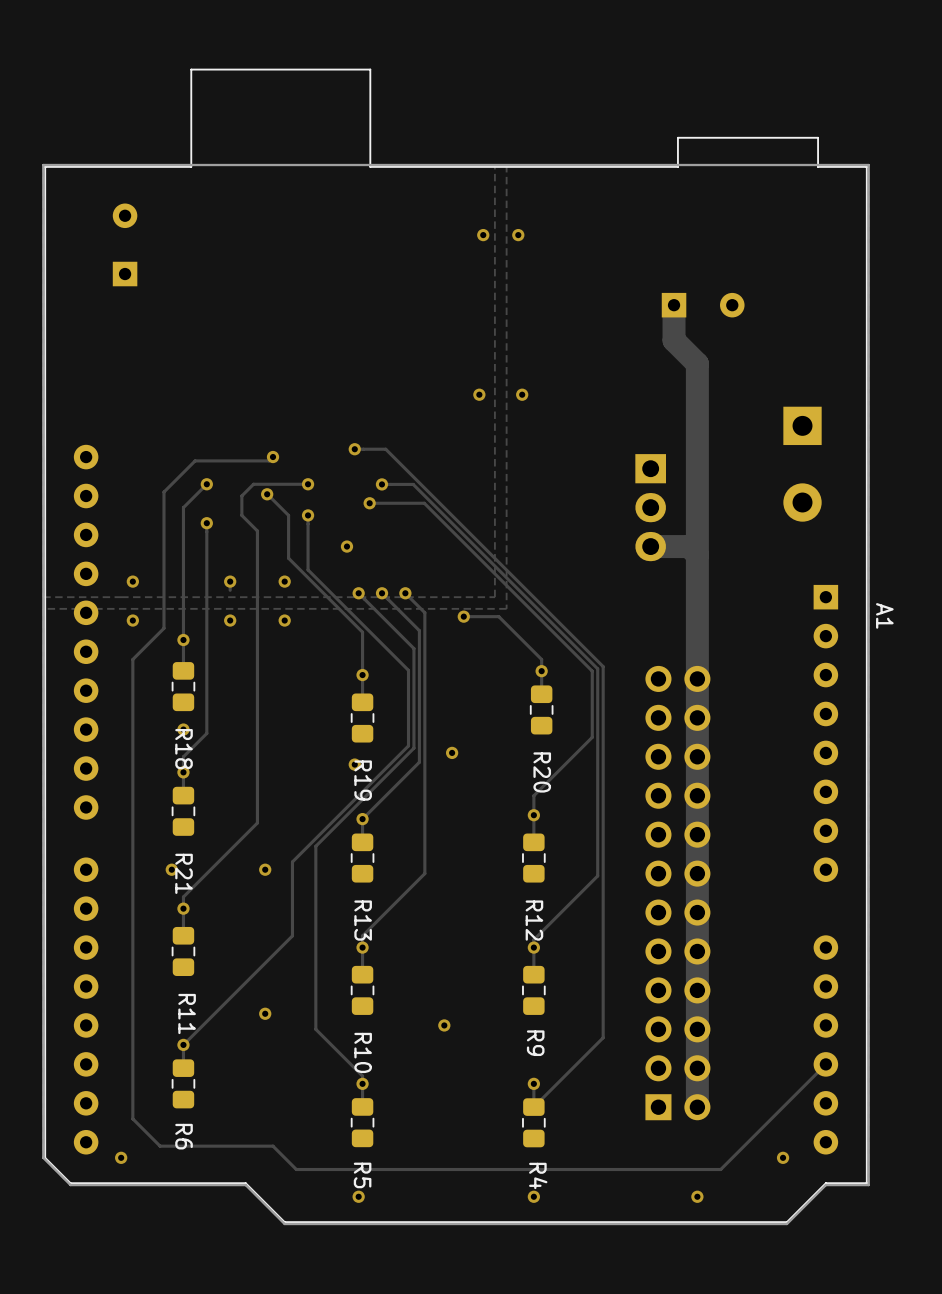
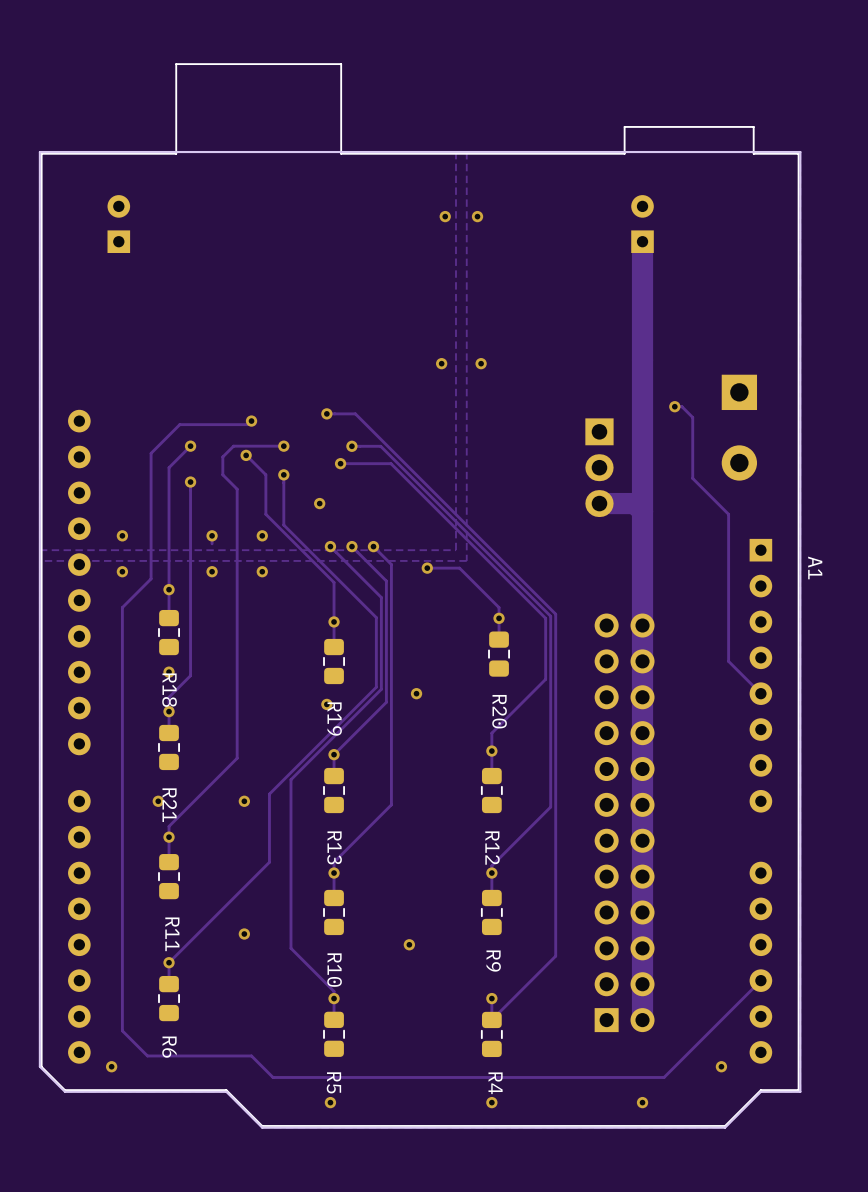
part footprint: [112, 203, 138, 287] -> [107, 195, 131, 254]
part: none -> (642, 224)
track: (674, 305) (674, 340) (697, 363) -> (642, 241) (642, 335)
part: (703, 305) -> none
track: none -> (674, 406) (681, 406) (692, 417) (692, 478) (728, 514) (728, 661) (760, 693)
via: none -> (674, 406)

